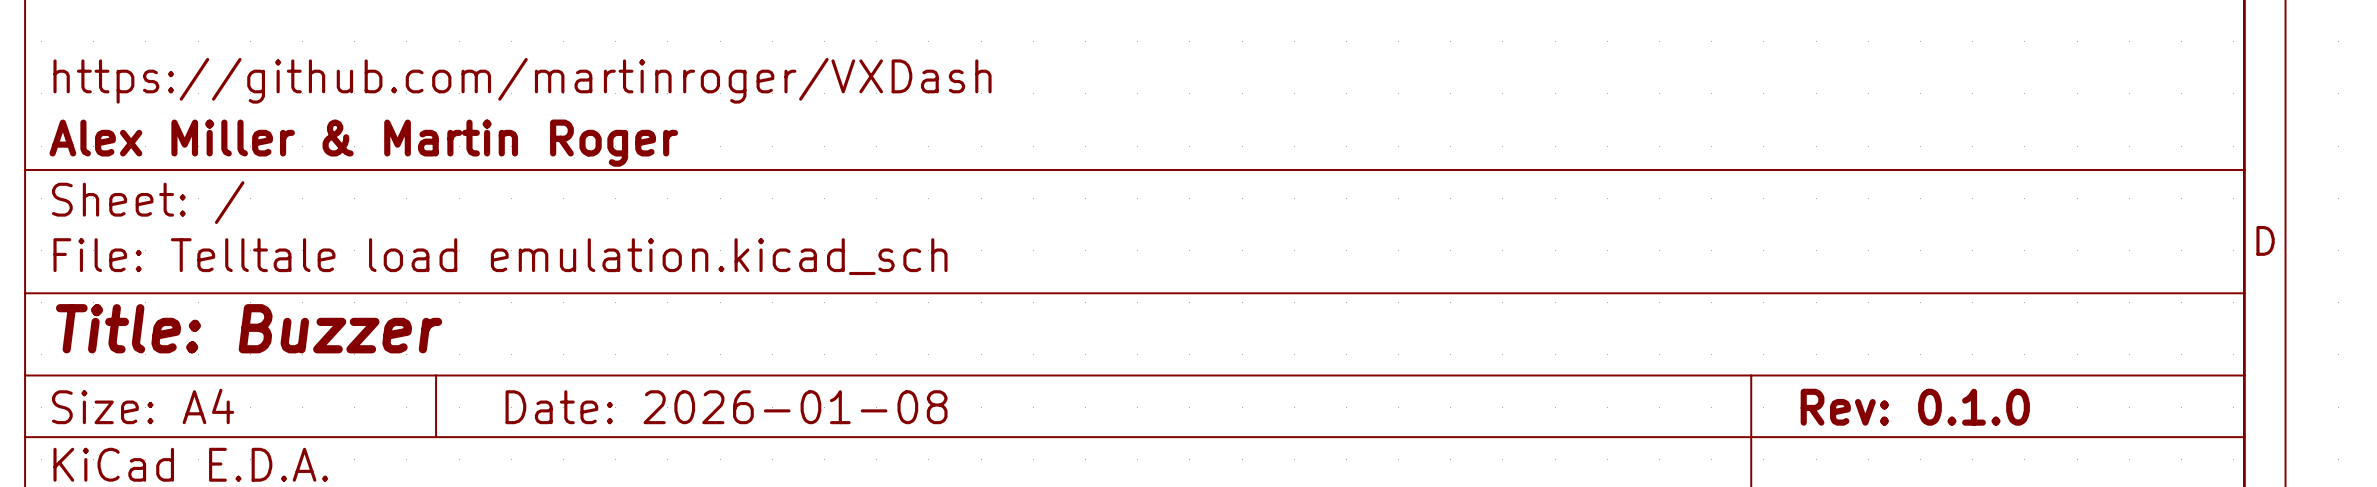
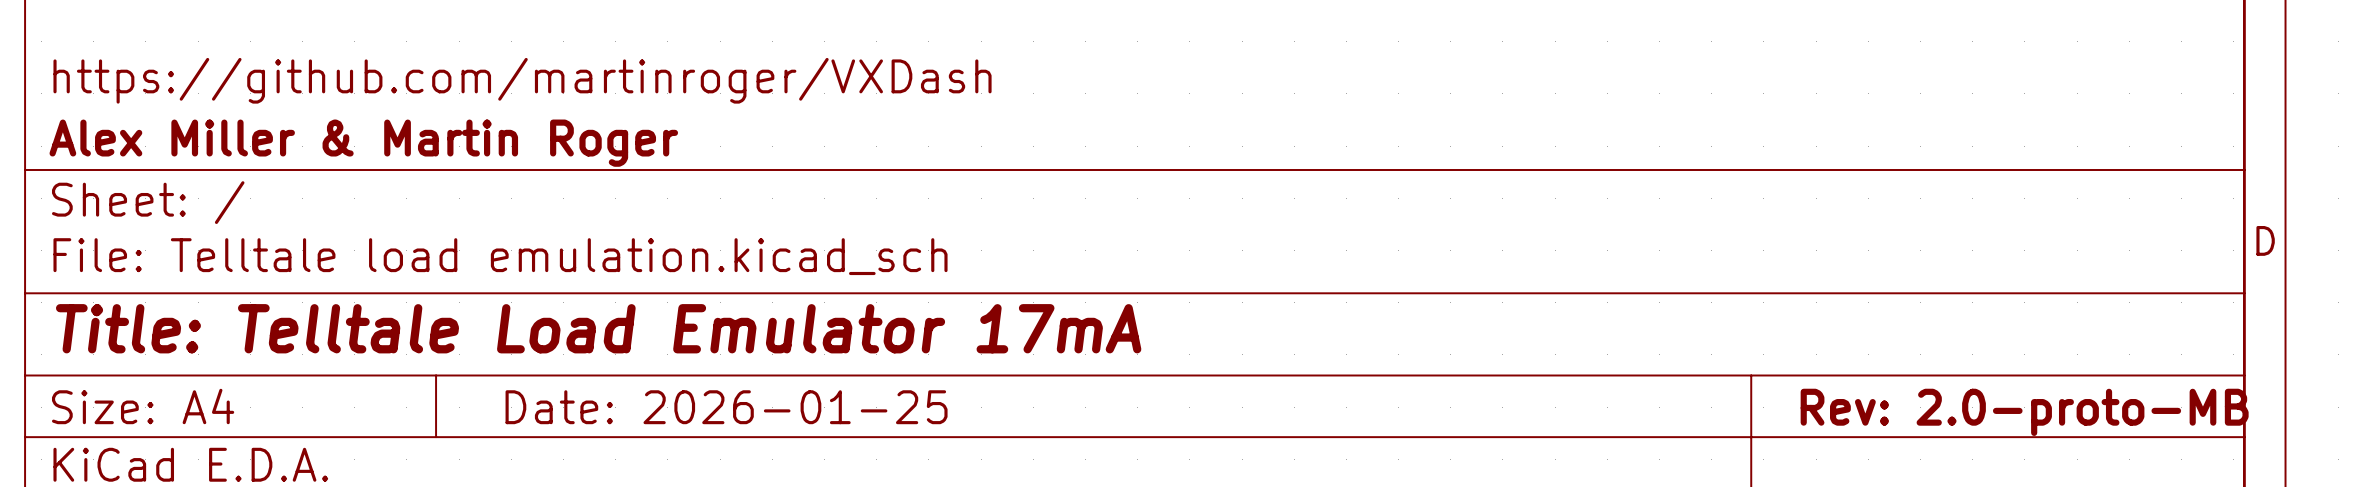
title block: Title: Buzzer (249, 328) -> Title: Telltale Load Emulator 17mA (598, 328)
title block: Date: 2026-01-08 (726, 407) -> Date: 2026-01-25 (726, 407)
title block: Rev: 0.1.0 (1915, 407) -> Rev: 2.0-proto-MB (2024, 412)

